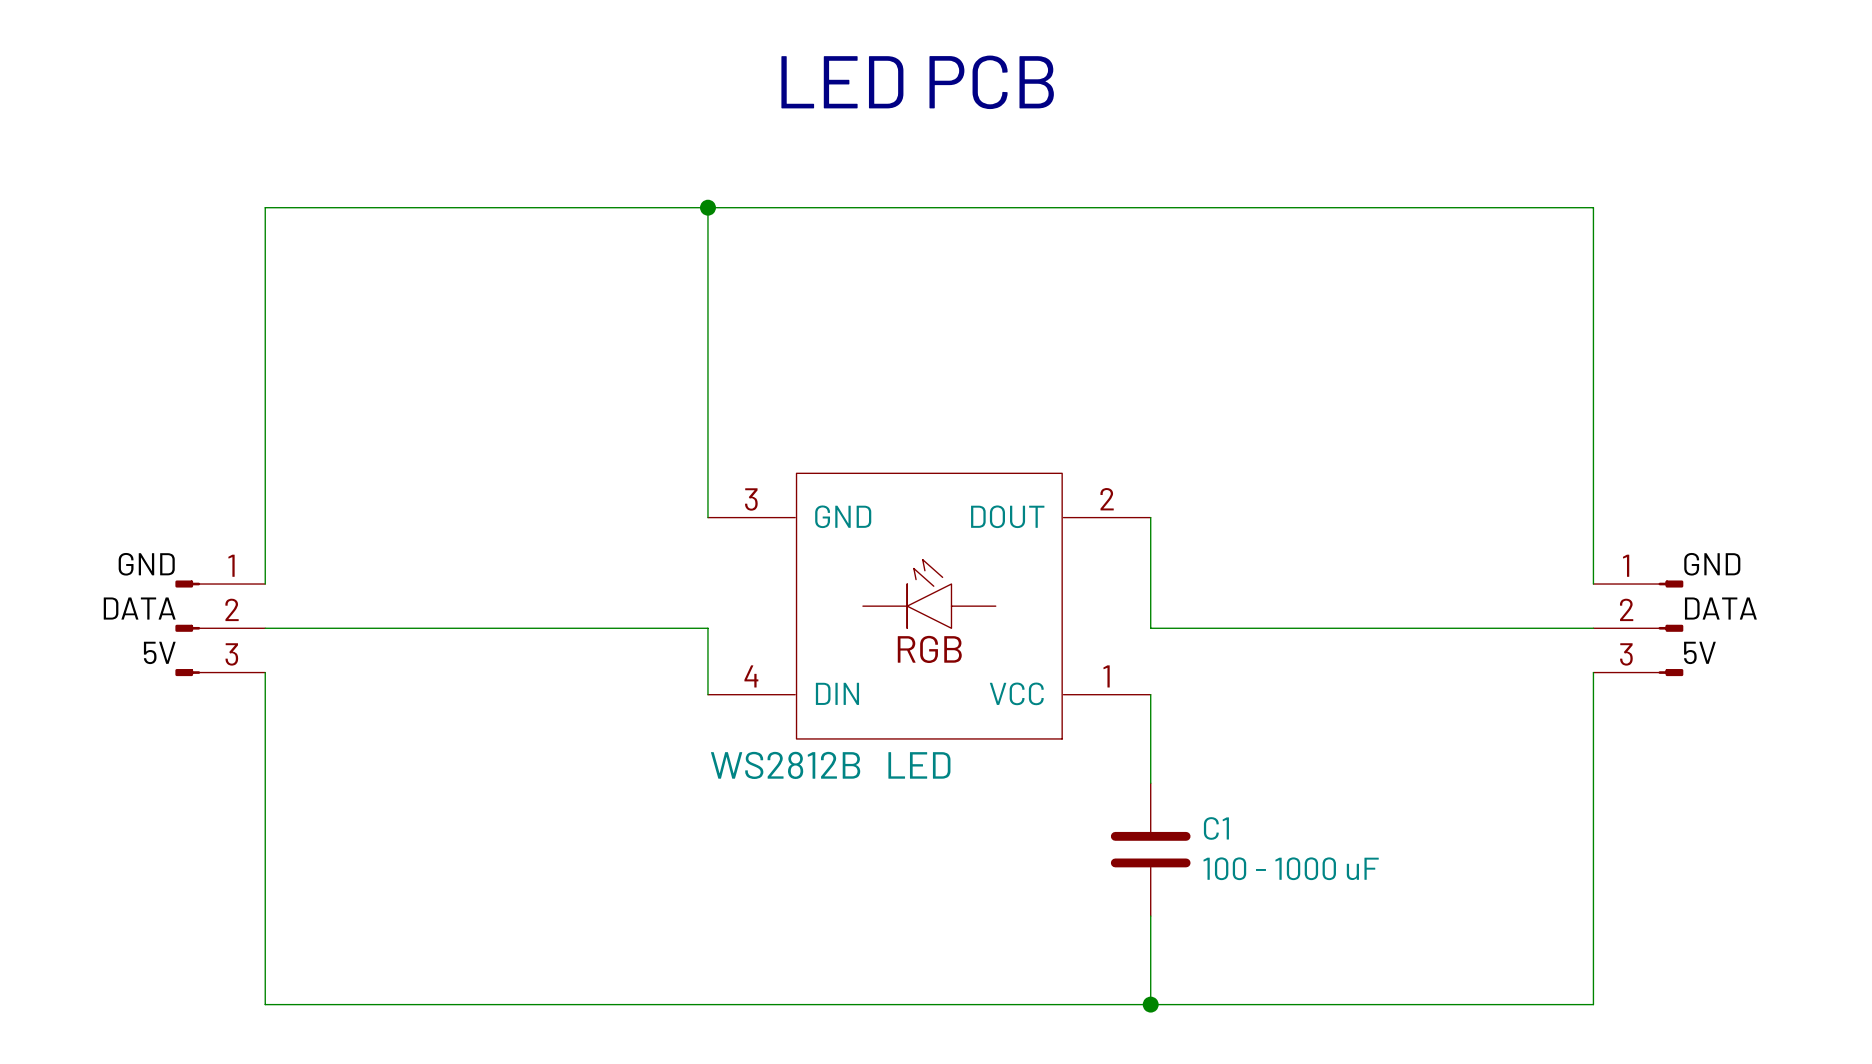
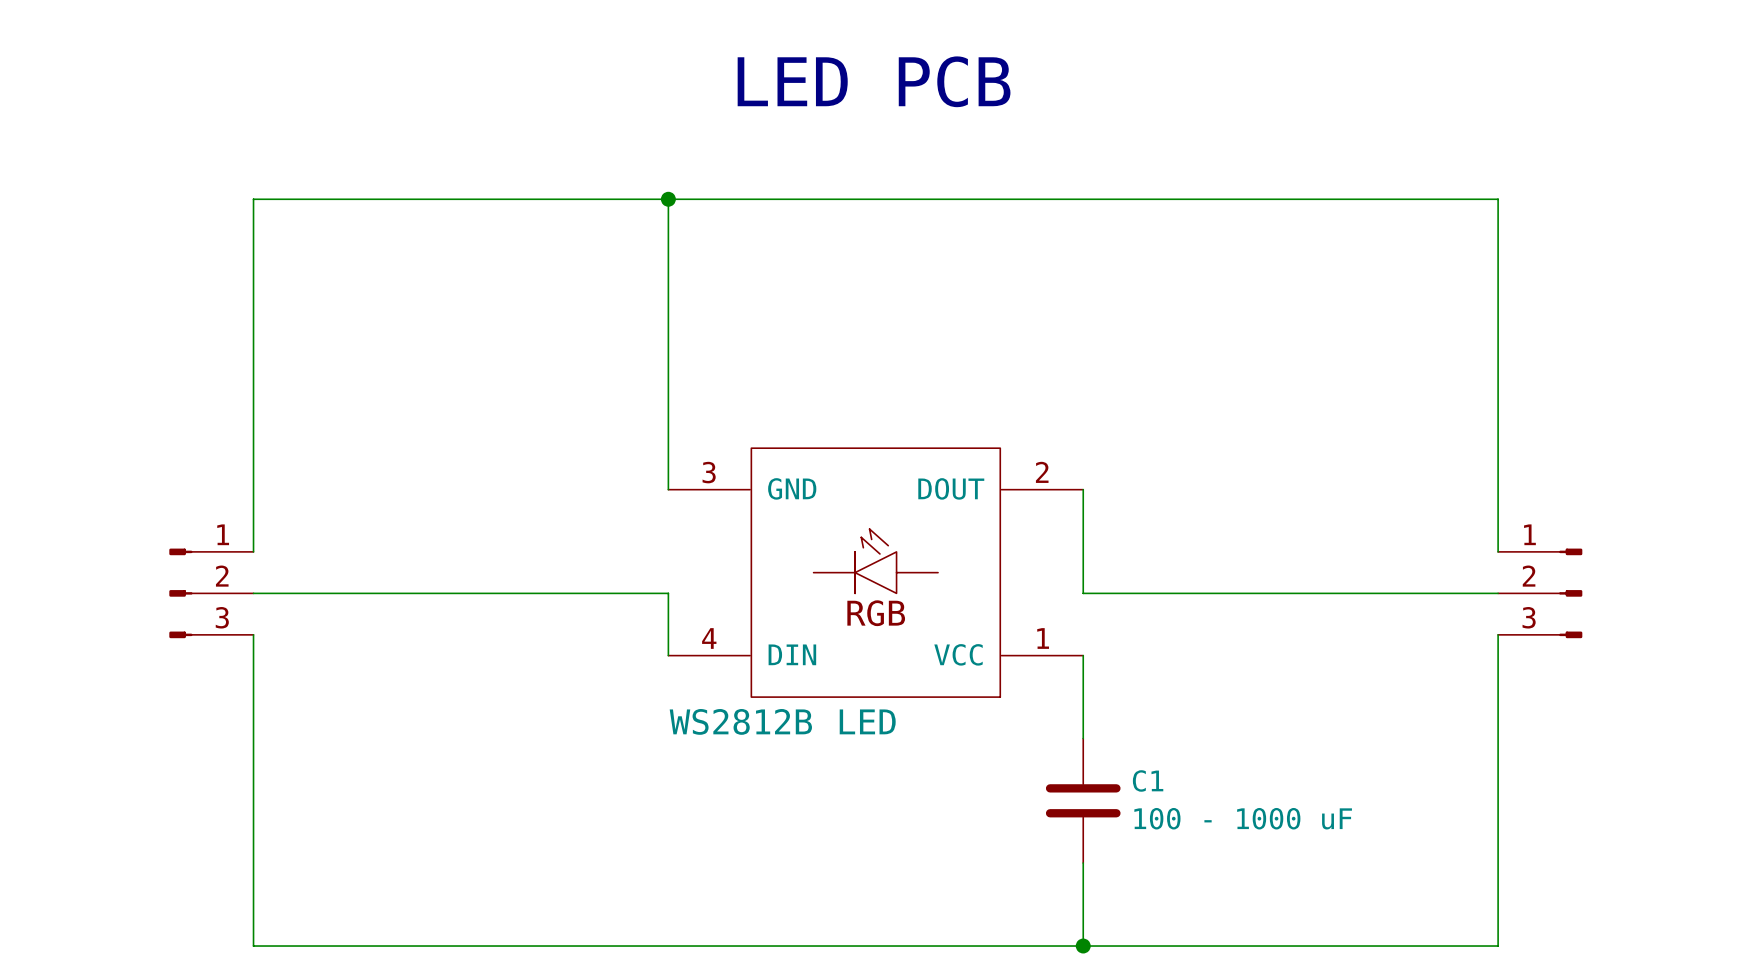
label: GND (146, 564) -> none
label: GND (1712, 564) -> none
label: DATA (139, 608) -> none
label: DATA (1720, 608) -> none
label: 5V (159, 652) -> none
label: 5V (1699, 652) -> none

